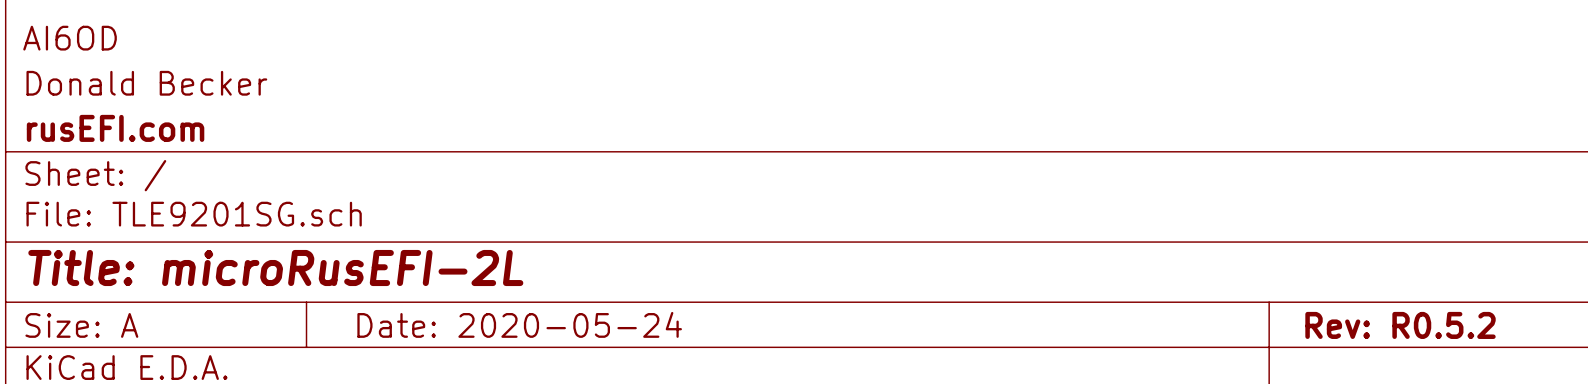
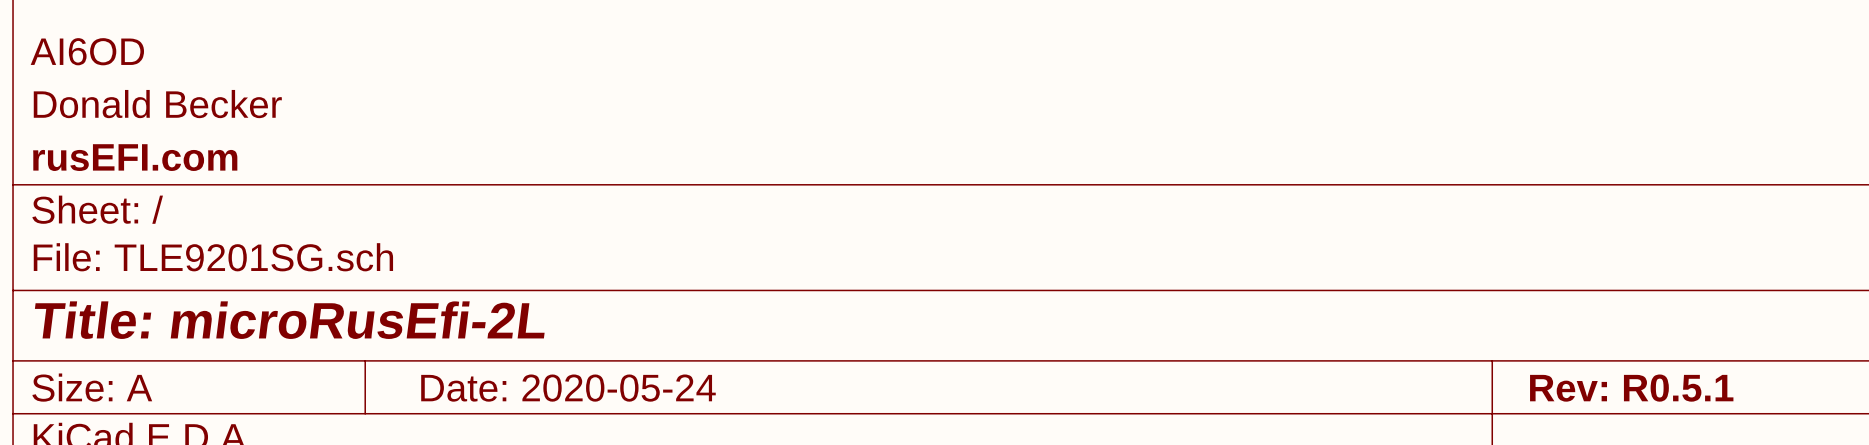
title block: Title: microRusEFI-2L (275, 267) -> Title: microRusEfi-2L (289, 320)
title block: Rev: R0.5.2 (1400, 325) -> Rev: R0.5.1 (1631, 388)

